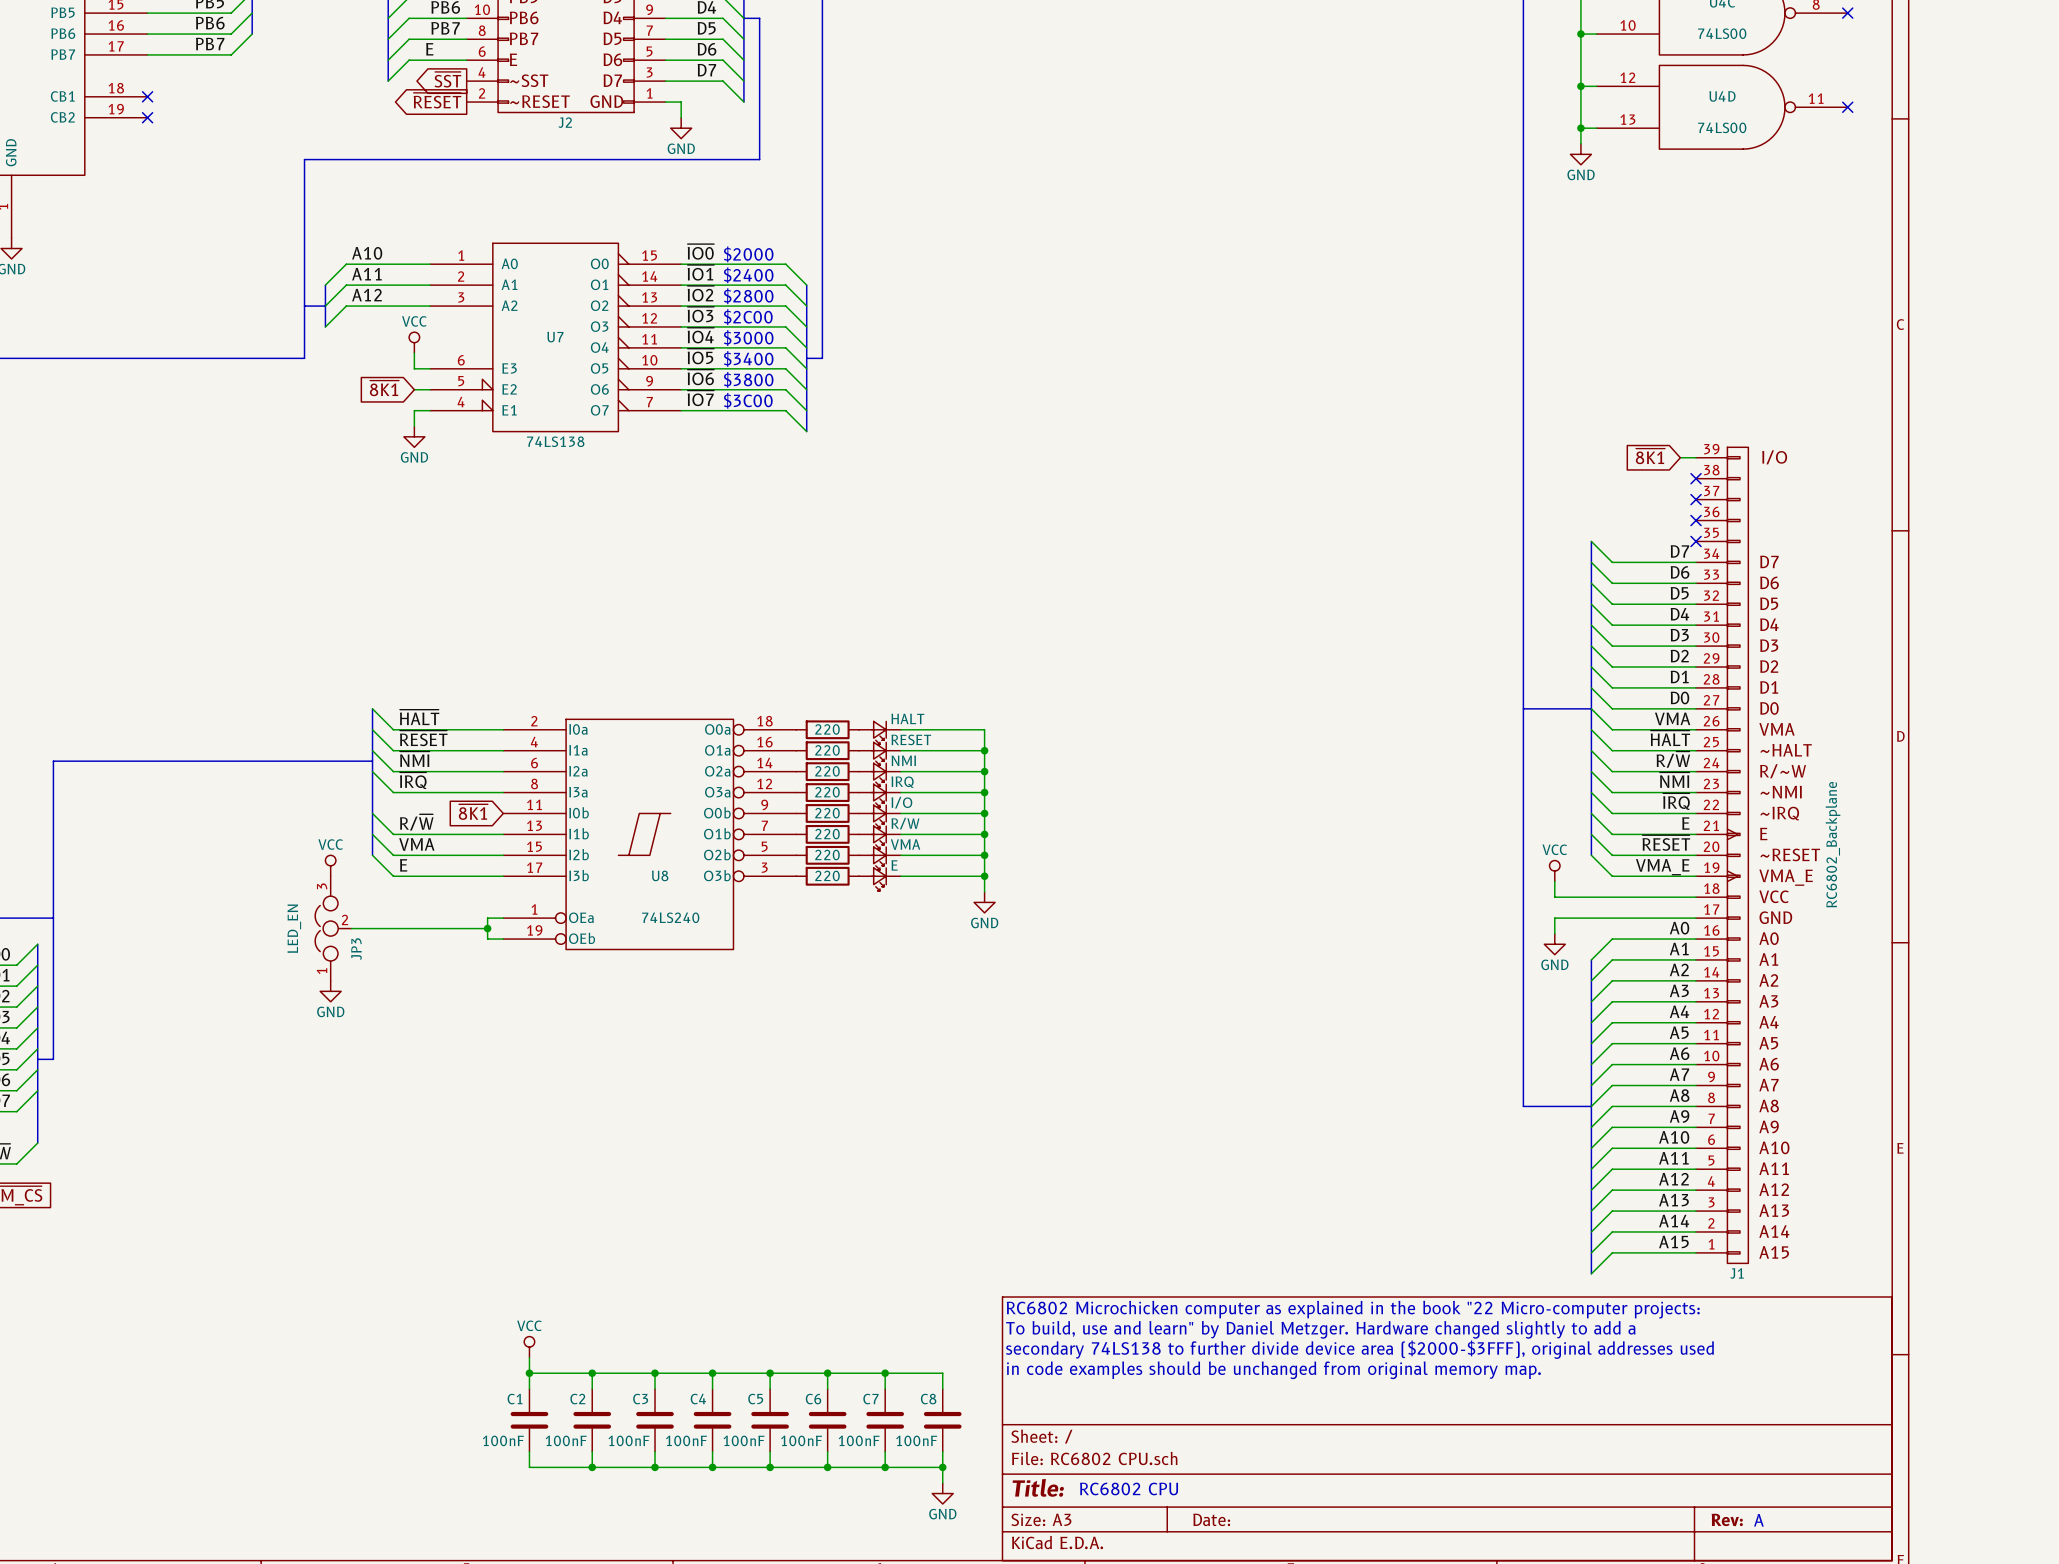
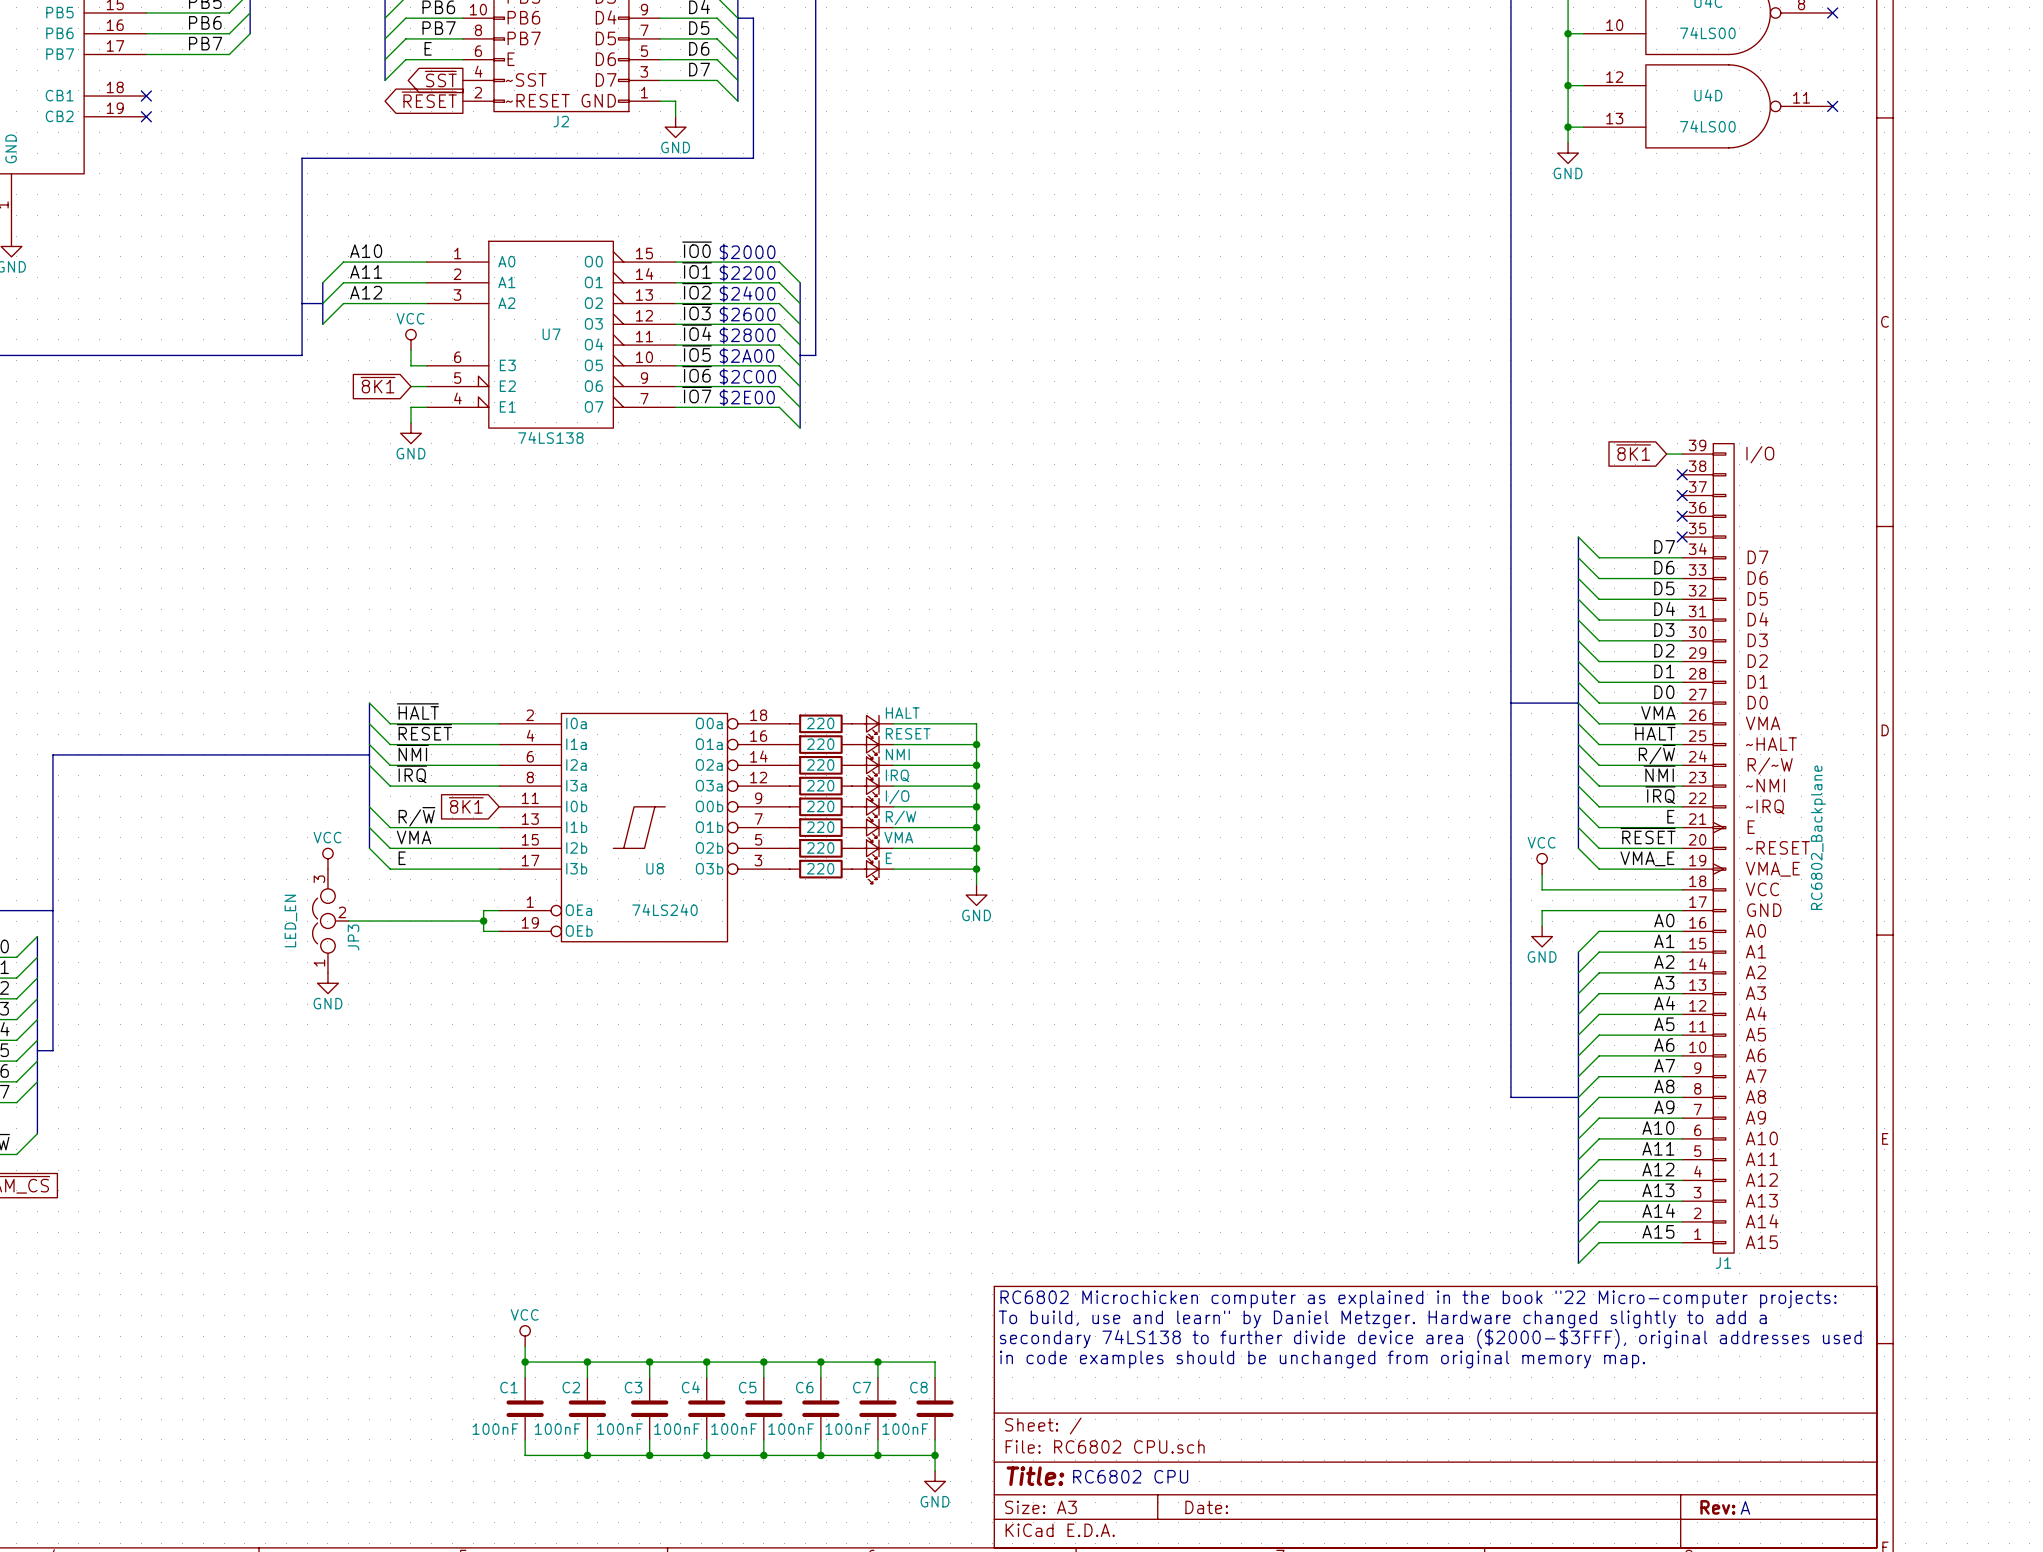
text: $2400 (748, 275) -> $2200 (747, 273)
text: $2800 (748, 296) -> $2400 (747, 293)
text: $2C00 (748, 317) -> $2600 (747, 314)
text: $3000 (748, 338) -> $2800 (747, 335)
text: $3400 (748, 358) -> $2A00 (746, 356)
text: $3800 (748, 379) -> $2C00 (747, 376)
text: $3C00 (748, 400) -> $2E00 (747, 397)

